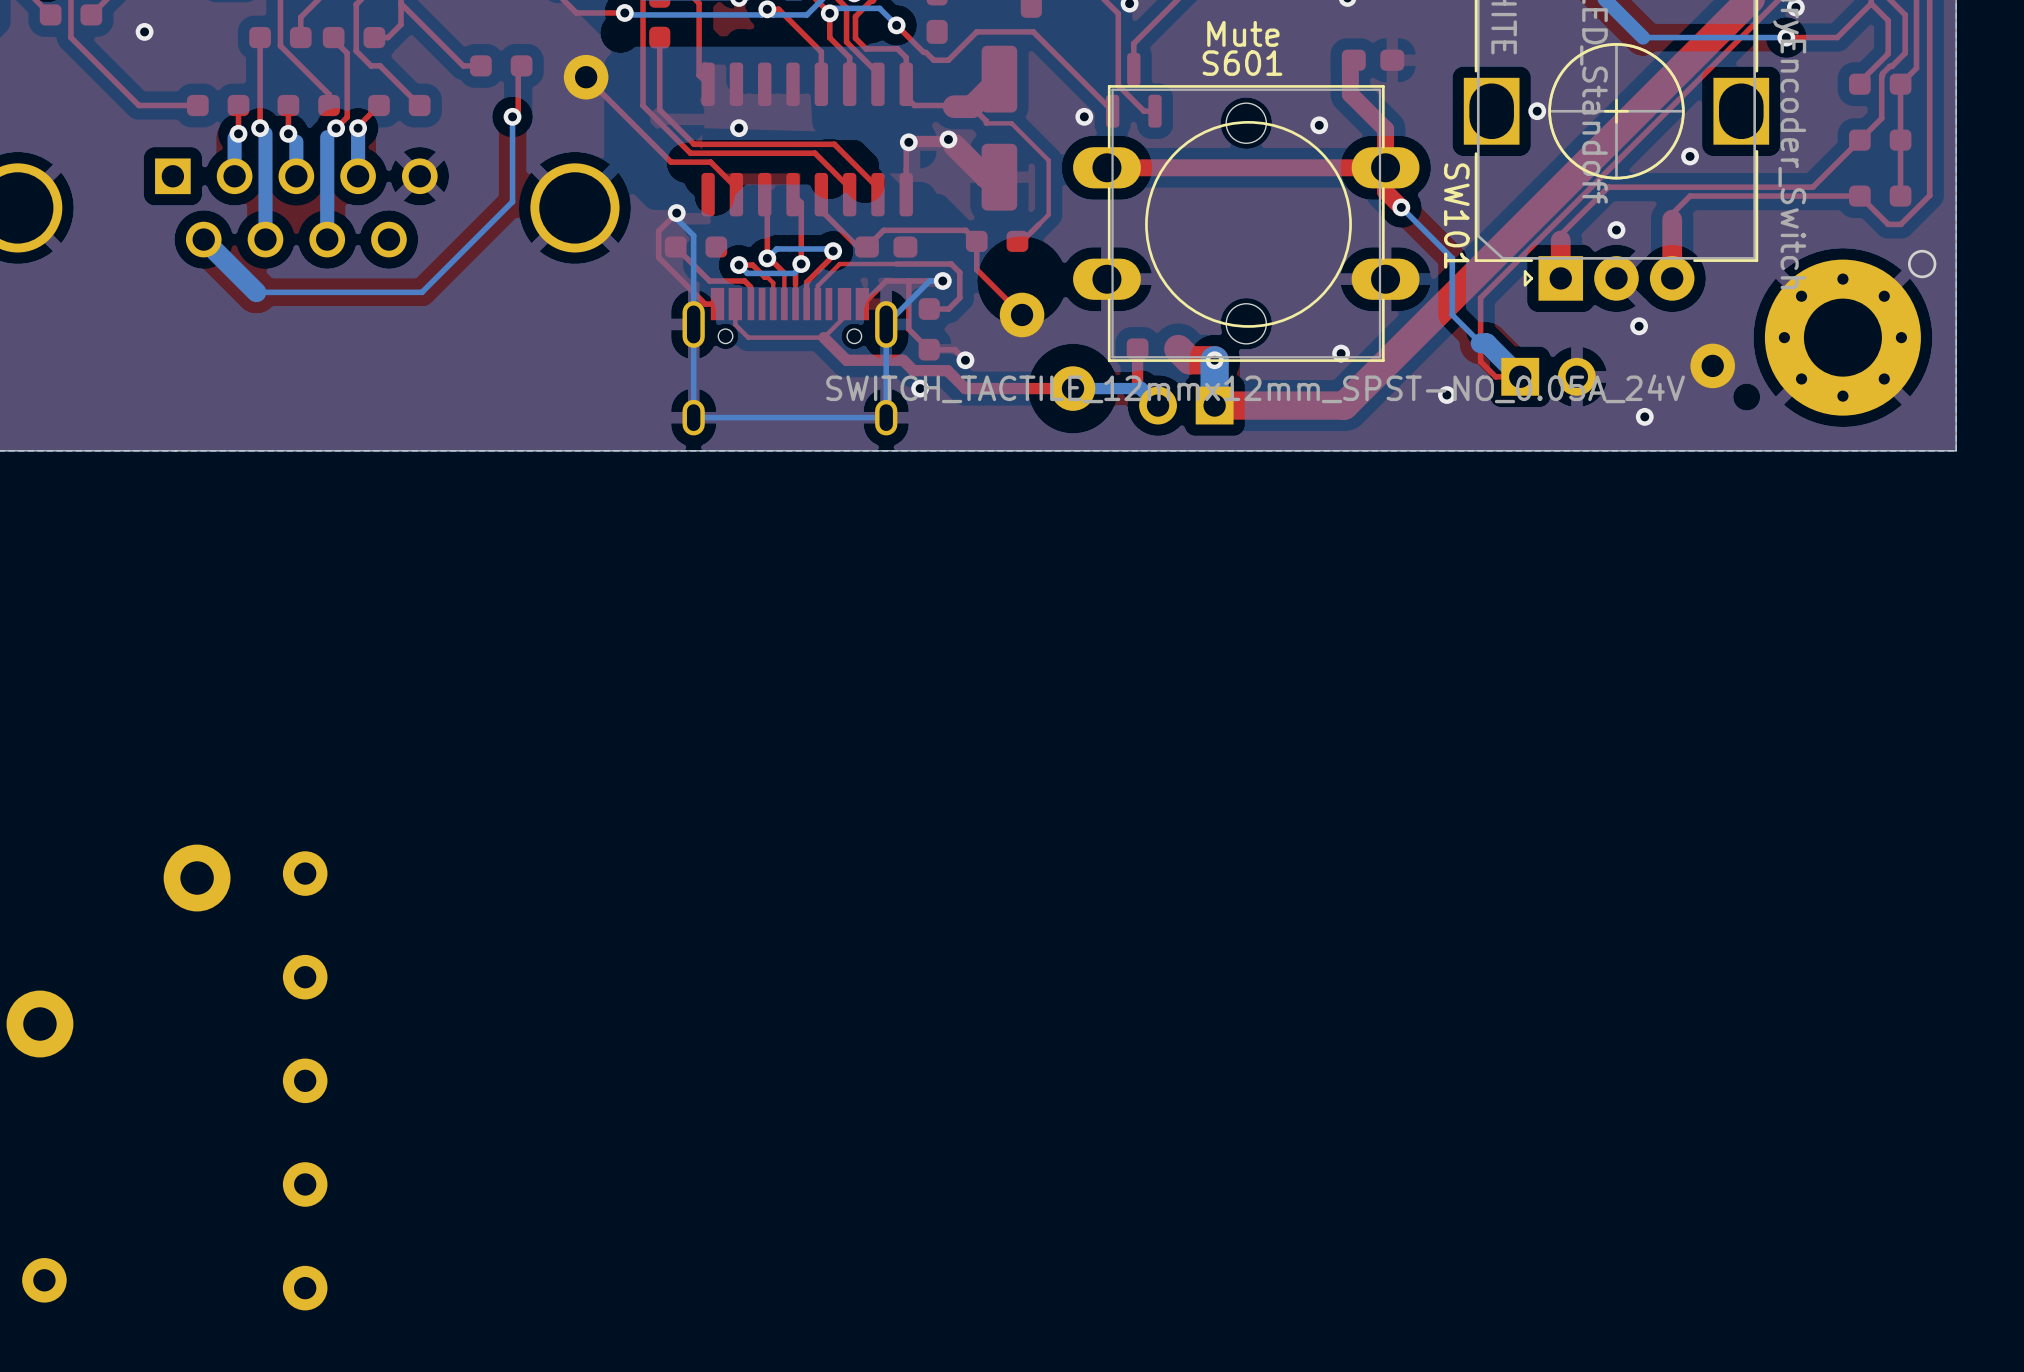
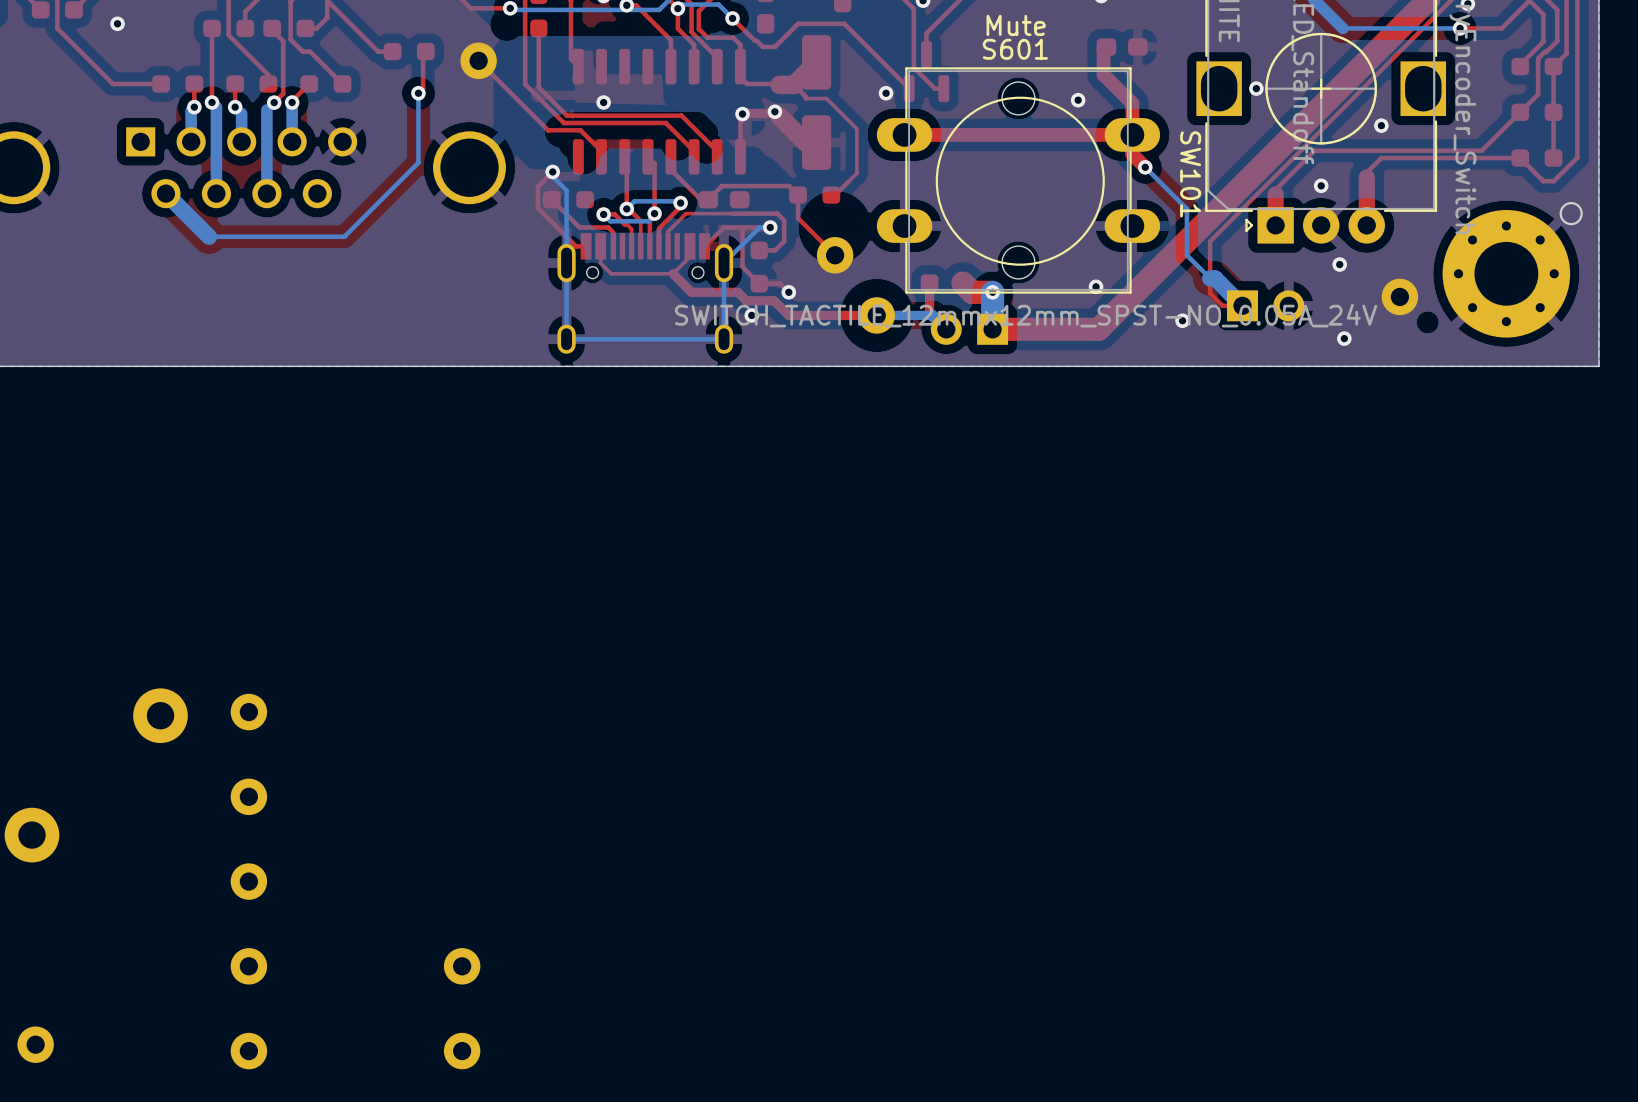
part: none -> (462, 966)
part: none -> (462, 1051)

